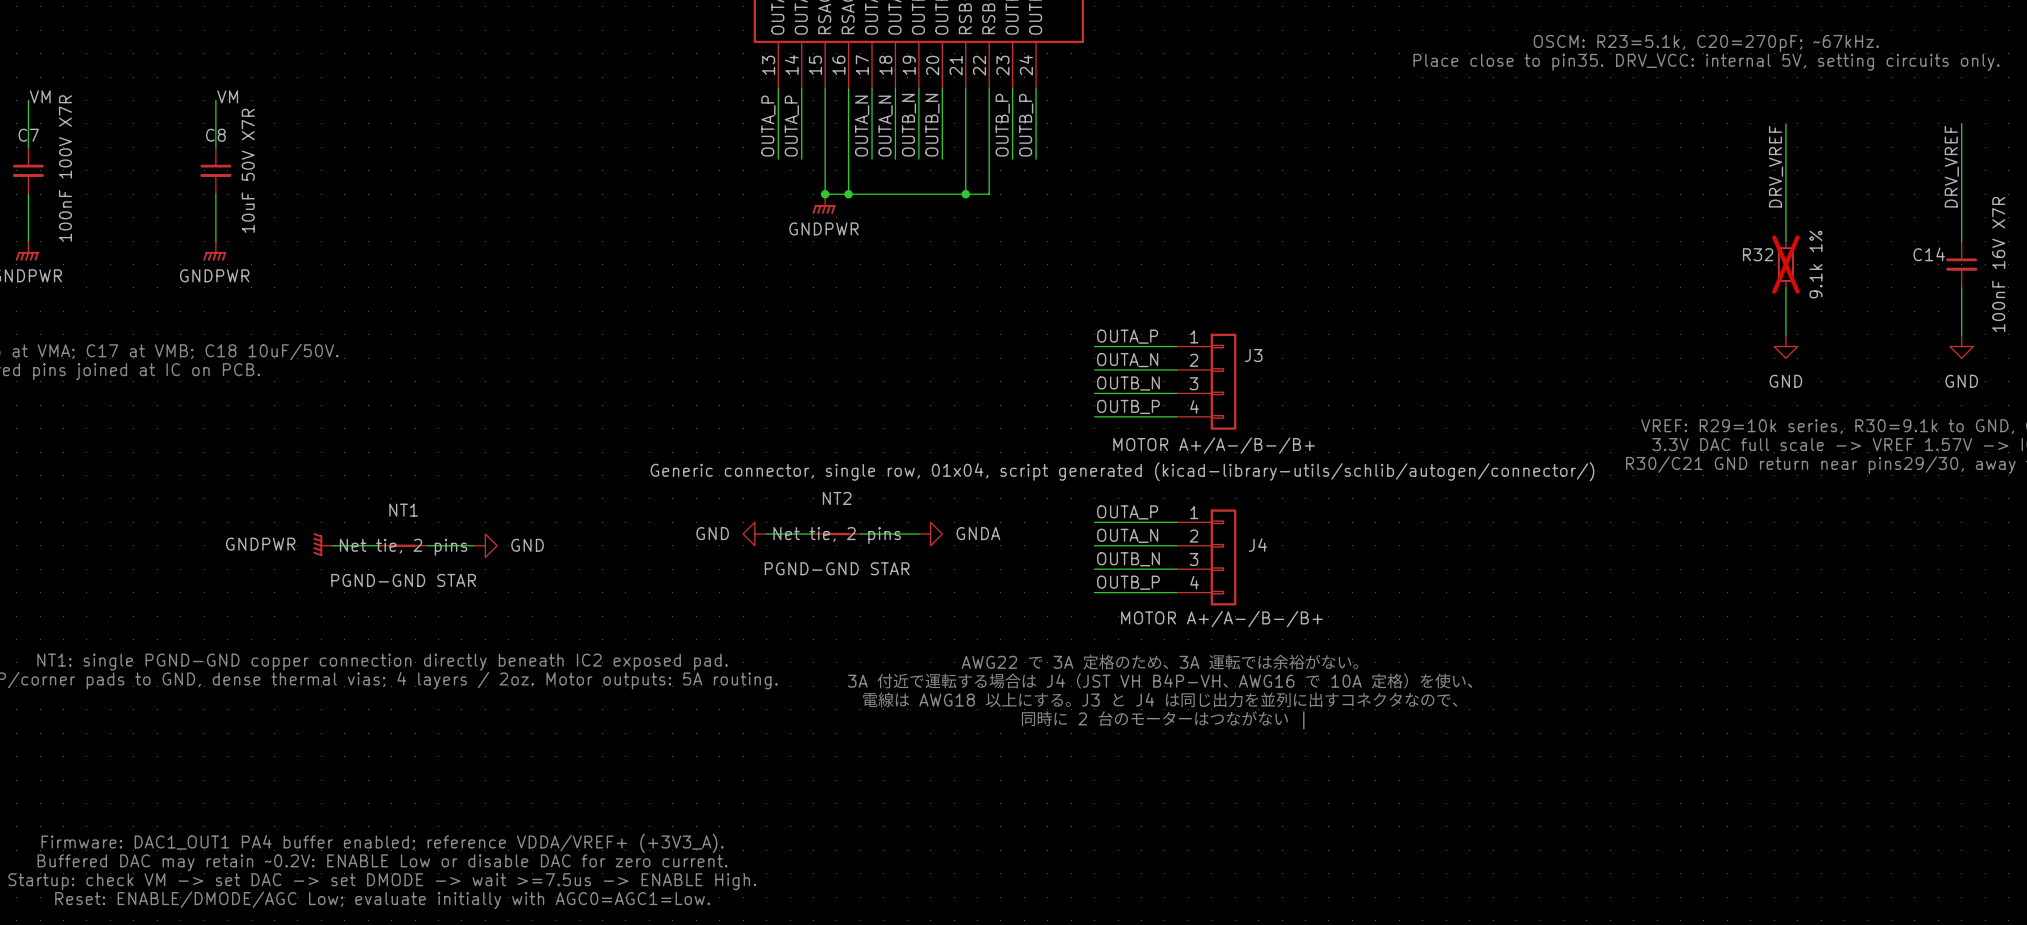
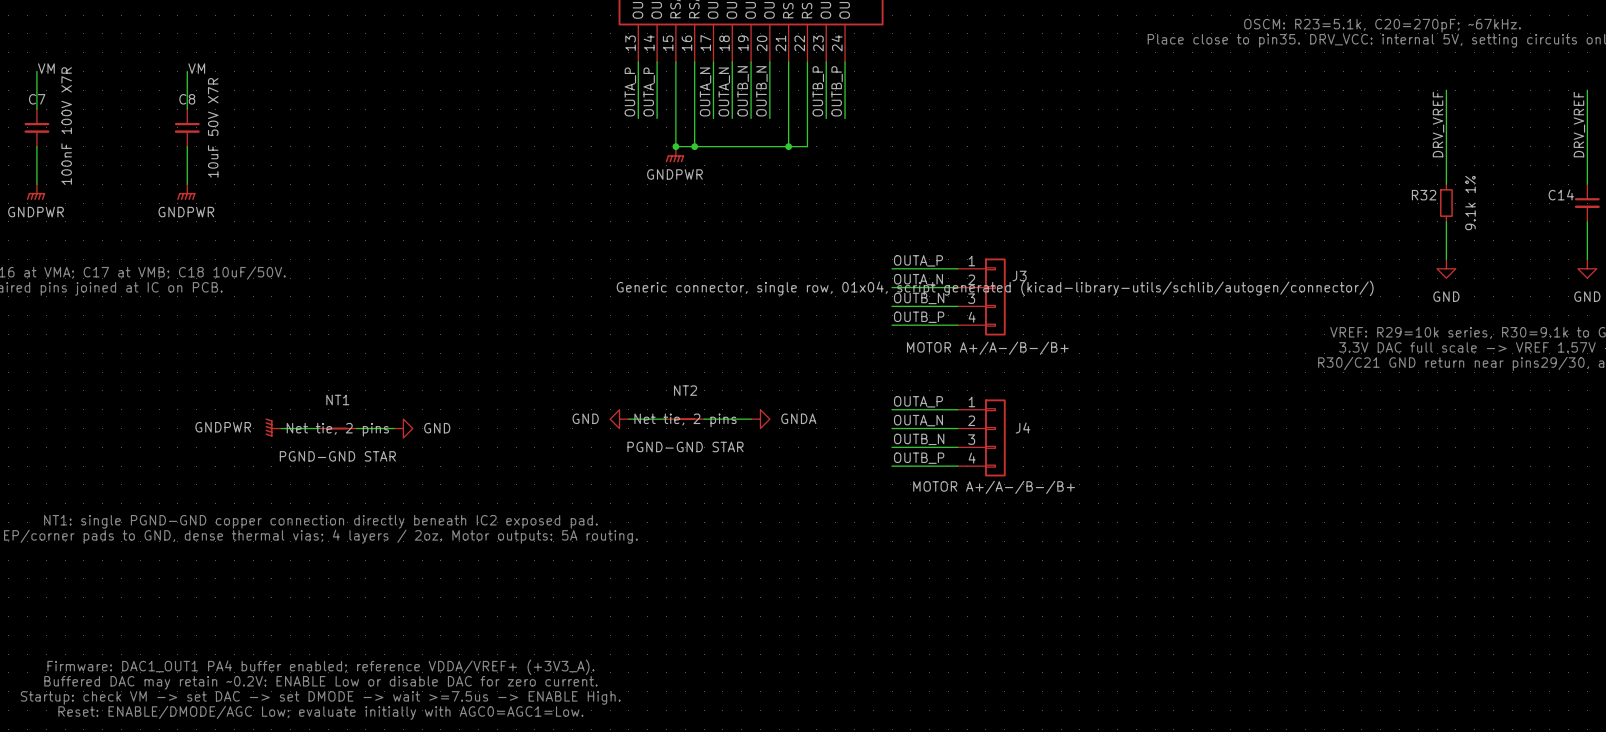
R32 do-not-place cross: (1785, 264) -> none
J3 text position: Generic connector, single row, 01x04, script generated (kicad-library-utils/schlib/autogen/connector/) (1122, 471) -> Generic connector, single row, 01x04, script generated (kicad-library-utils/schlib/autogen/connector/) (995, 288)
text: AWG22 で 3A 定格のため、3A 運転では余裕がない。 (1160, 662) -> none
text: 3A 付近で運転する場合は J4（JST VH B4P-VH、AWG16 で 10A 定格）を使い、 (1160, 680) -> none
text: 電線は AWG18 以上にする。J3 と J4 は同じ出力を並列に出すコネクタなので、 (1160, 699) -> none
text: 同時に 2 台のモーターはつながない | (1162, 719) -> none

